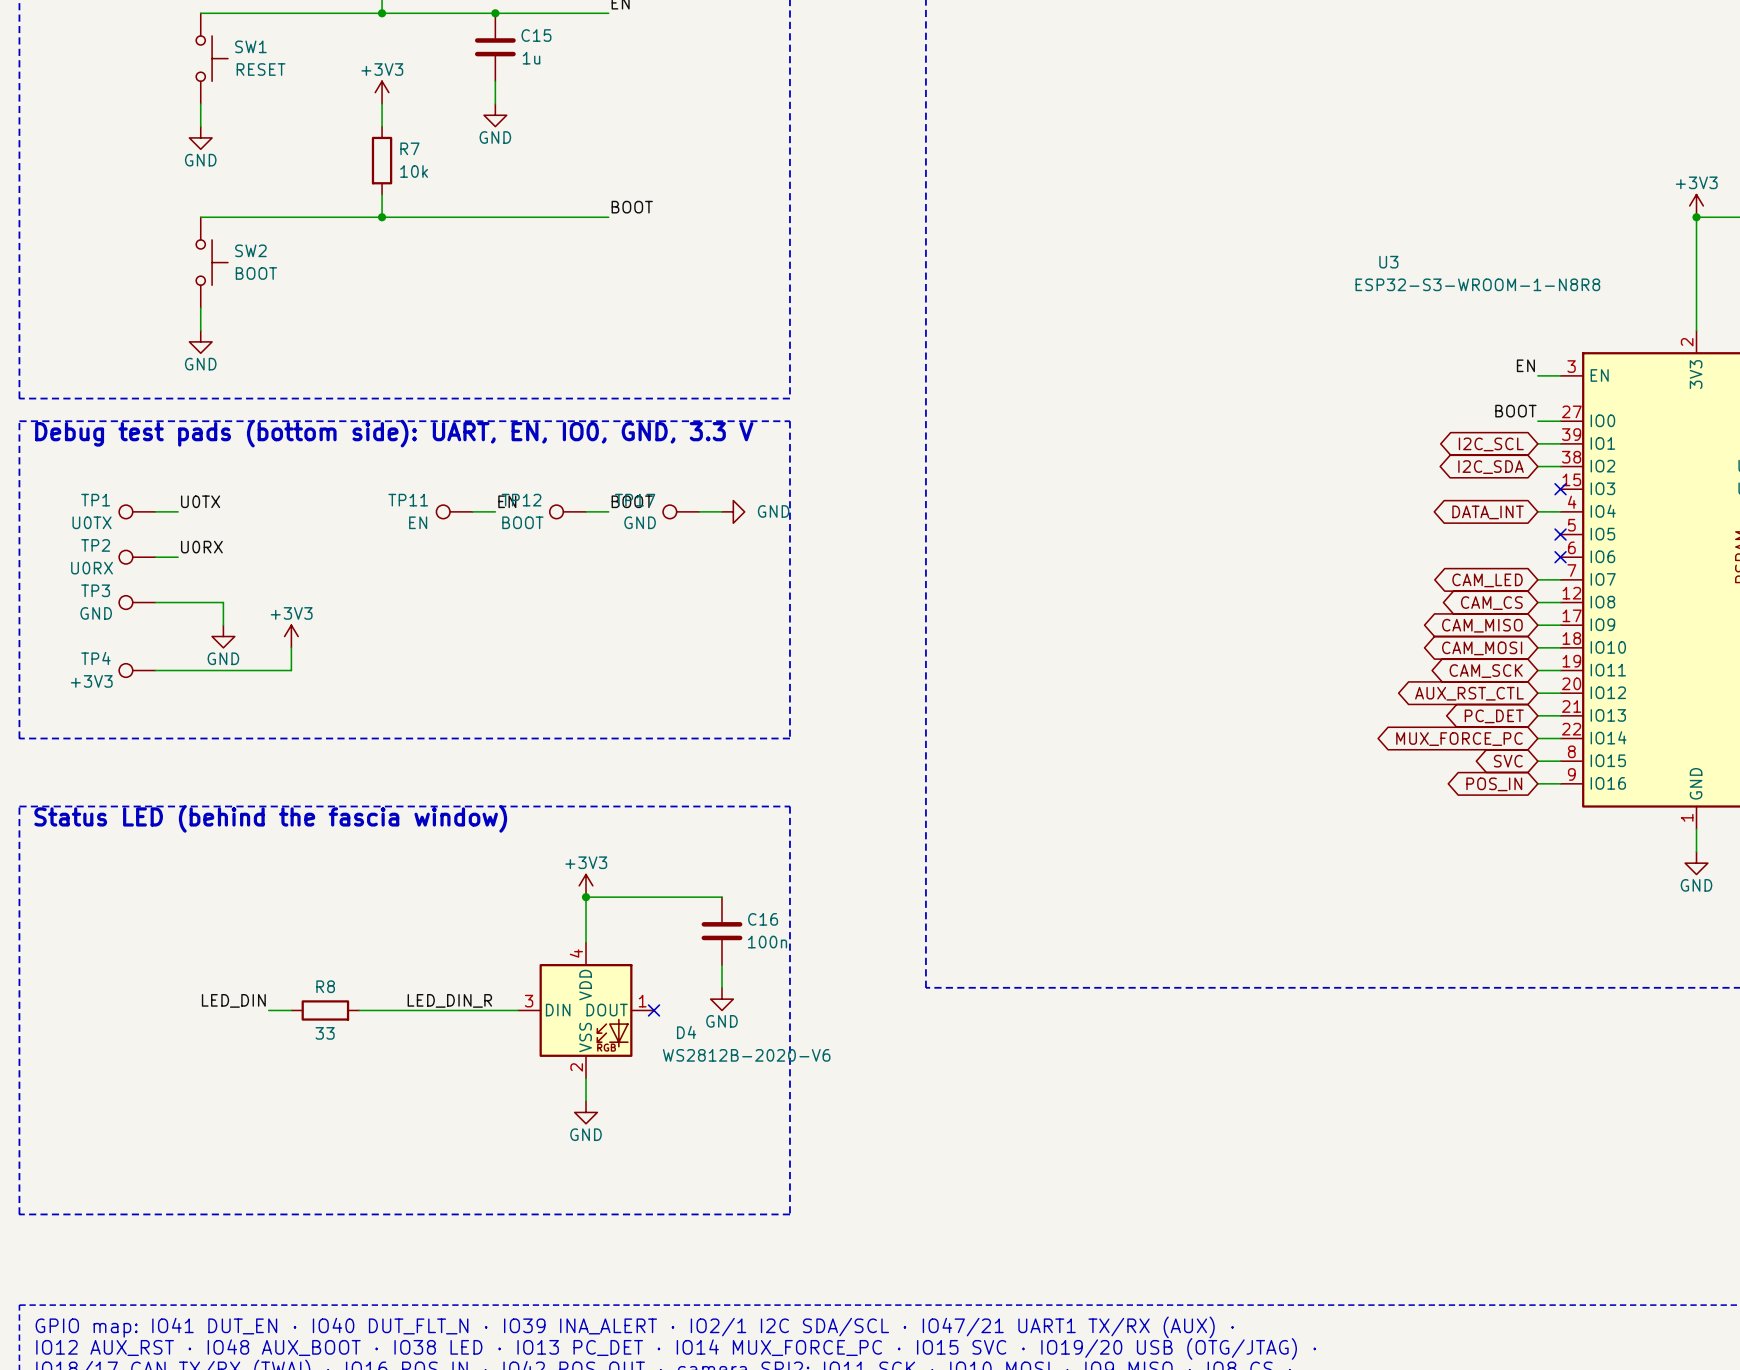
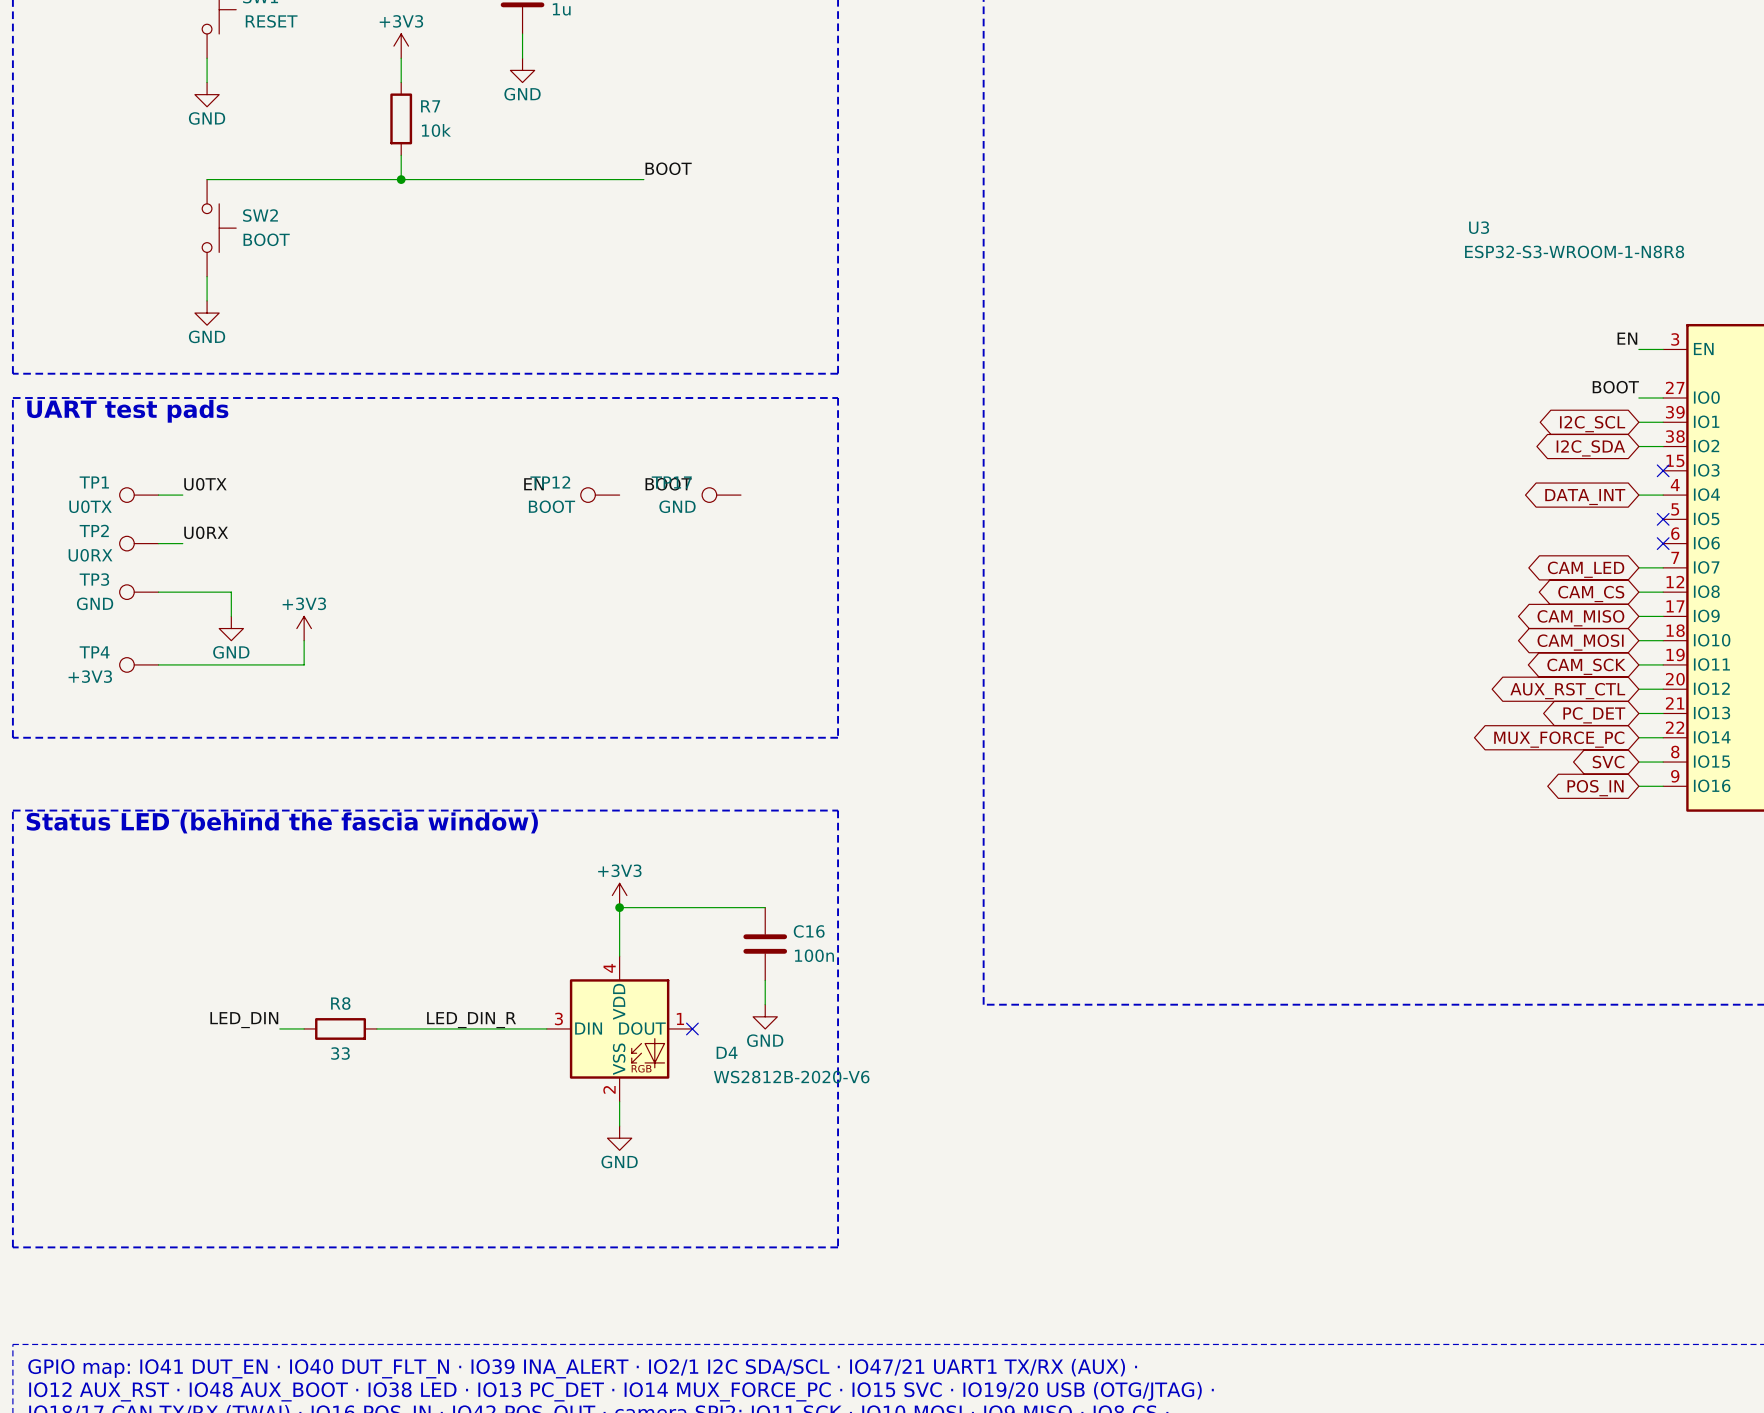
text: Debug test pads (bottom side): UART, EN, IO0, GND, 3.3 V (394, 433) -> UART test pads (127, 411)
TP11: EN (454, 511) -> none
wire: (472, 511) (495, 511) -> none
wire: (586, 511) (608, 511) -> none
wire: (699, 511) (721, 511) -> none
power symbol: GND (733, 511) -> none

